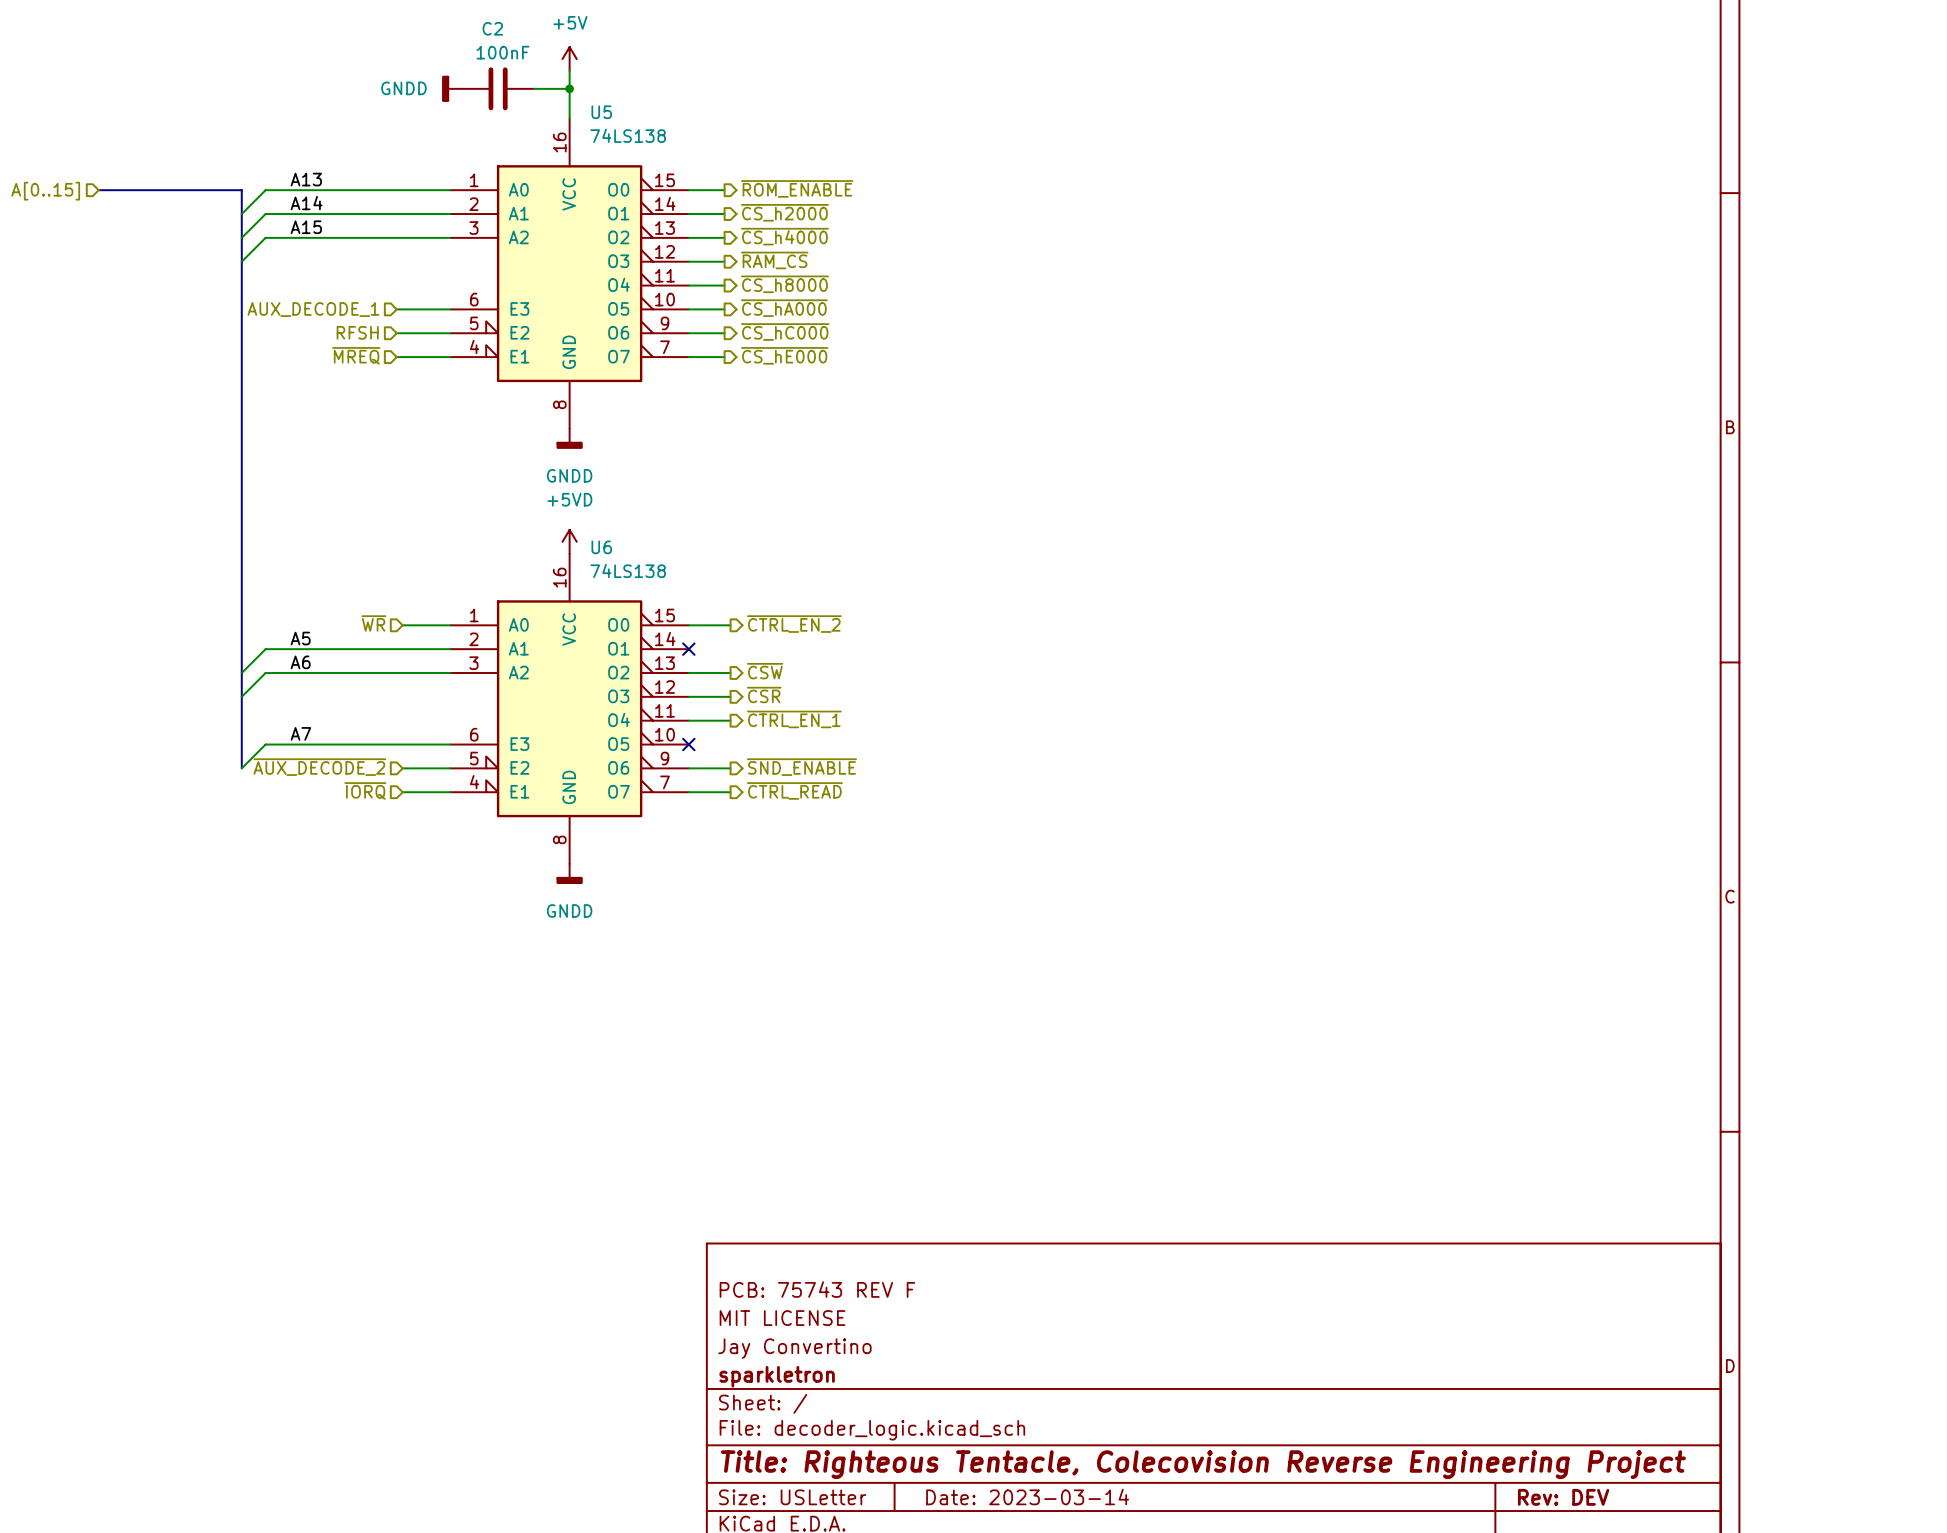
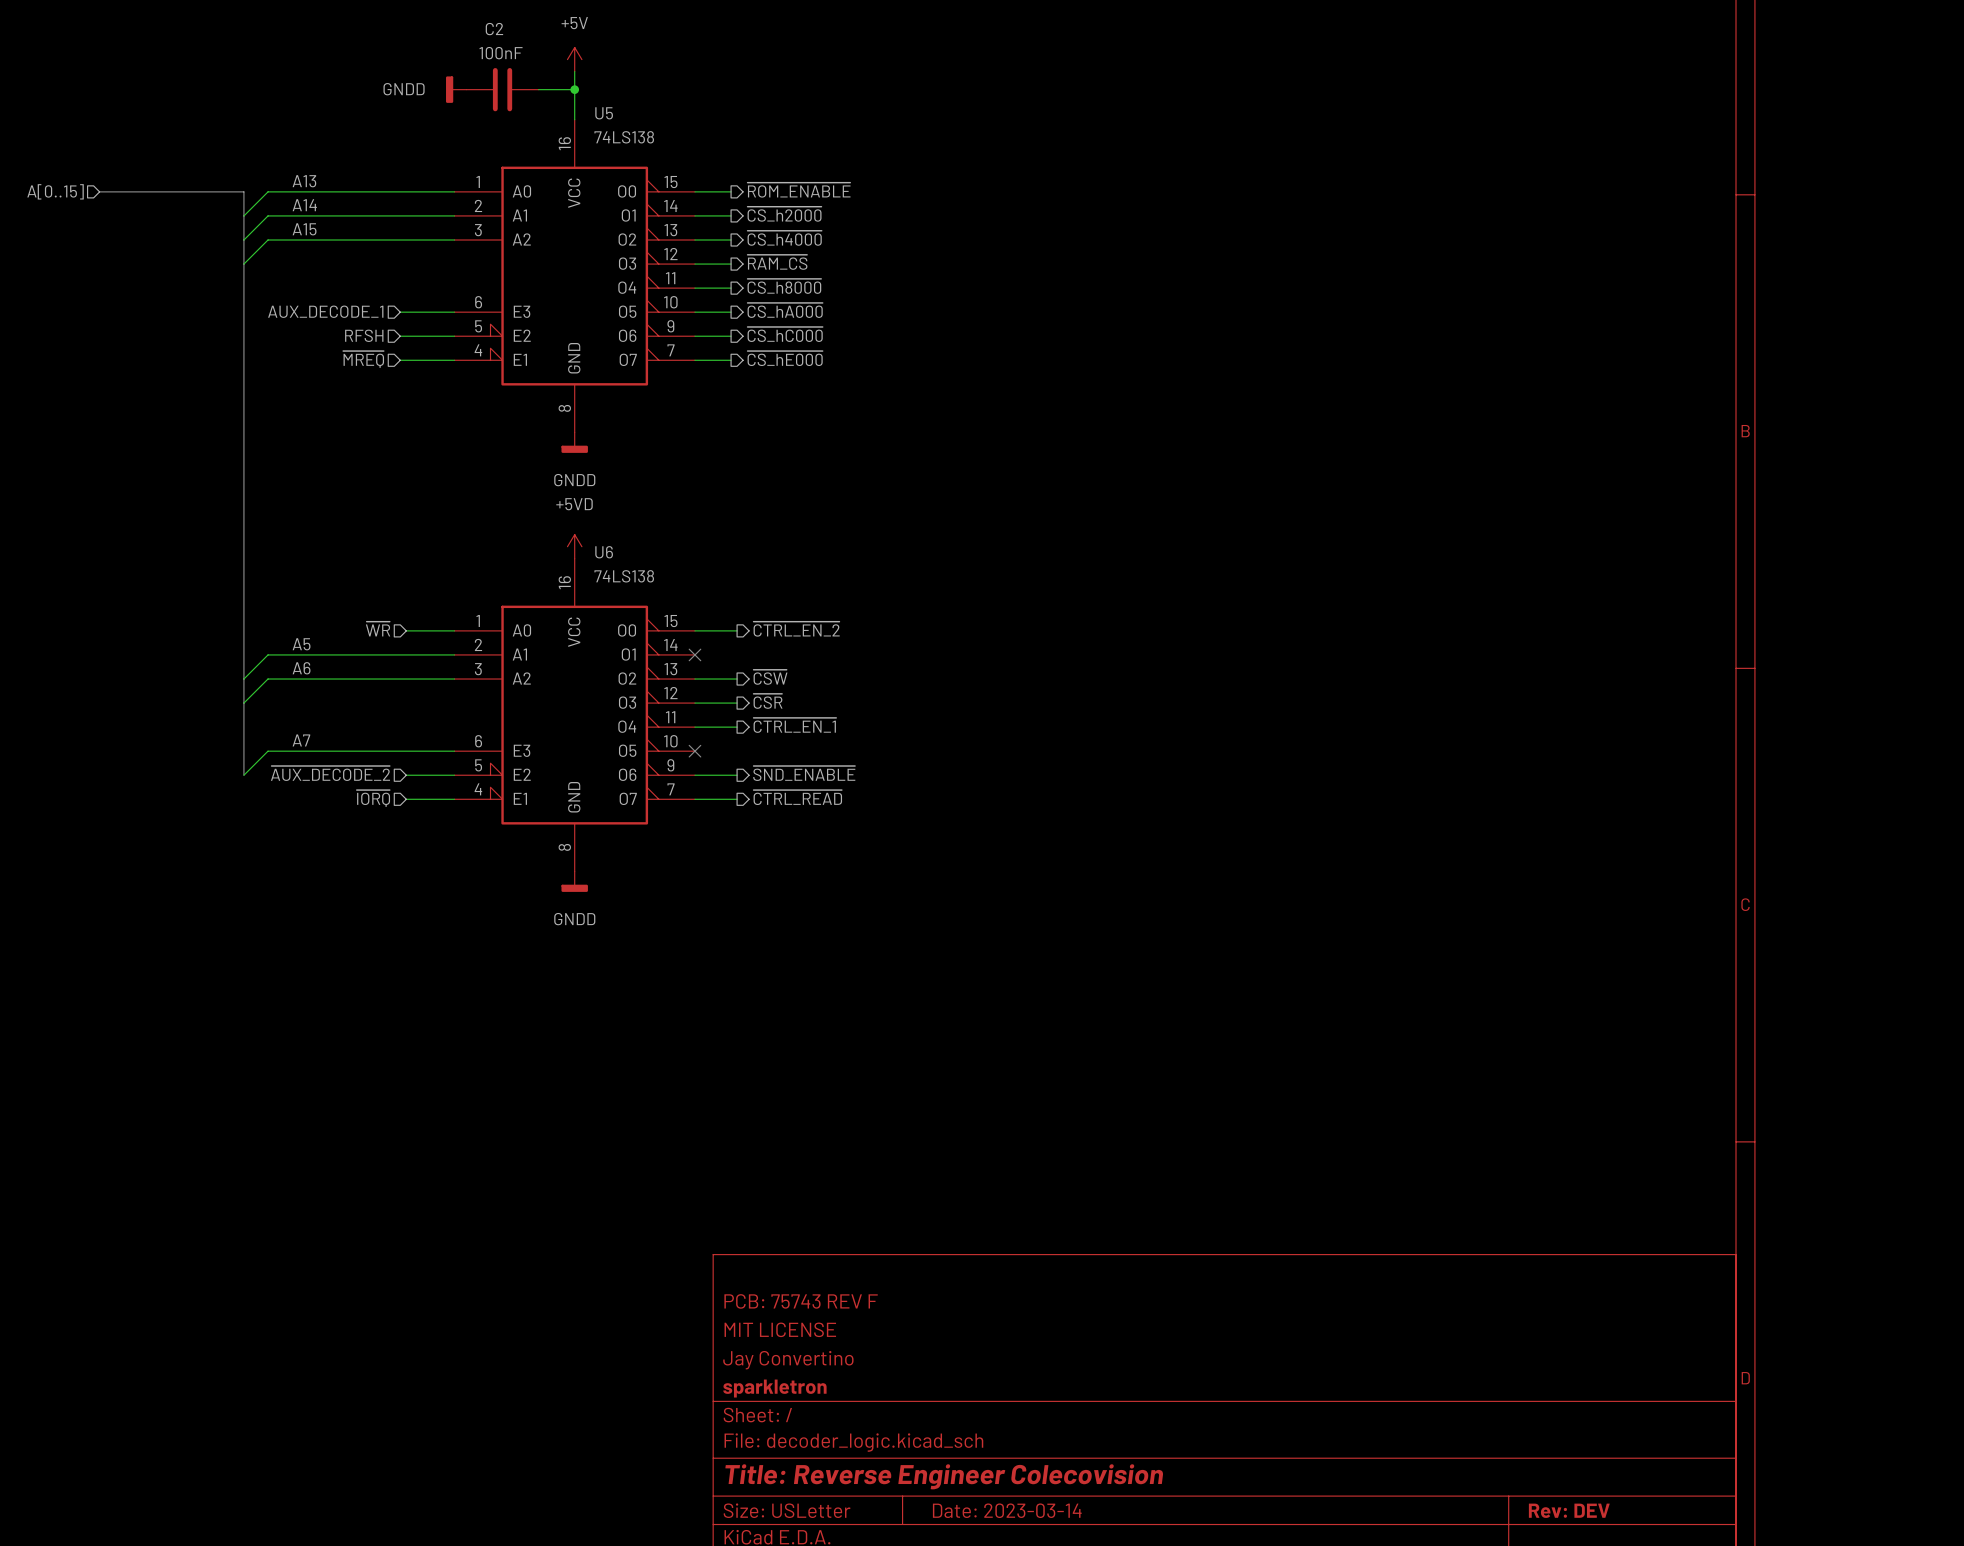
title block: Title: Righteous Tentacle, Colecovision Reverse Engineering Project (1203, 1464) -> Title: Reverse Engineer Colecovision (944, 1476)

